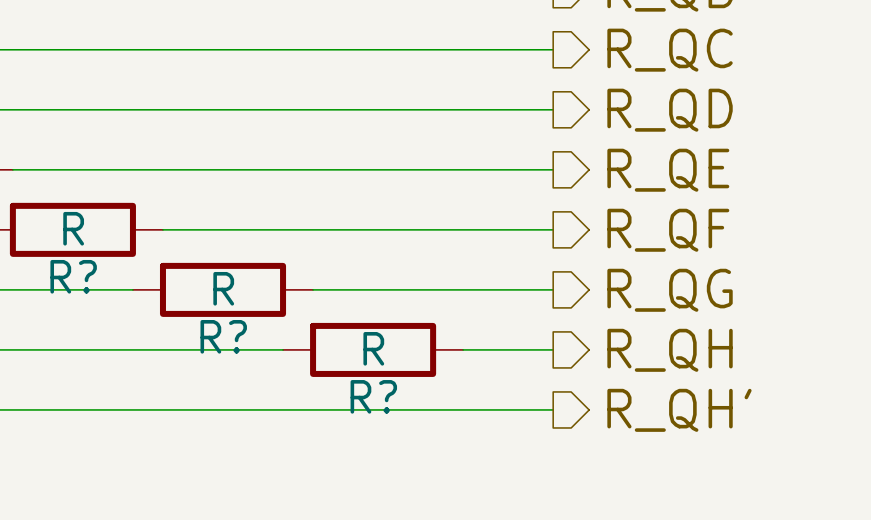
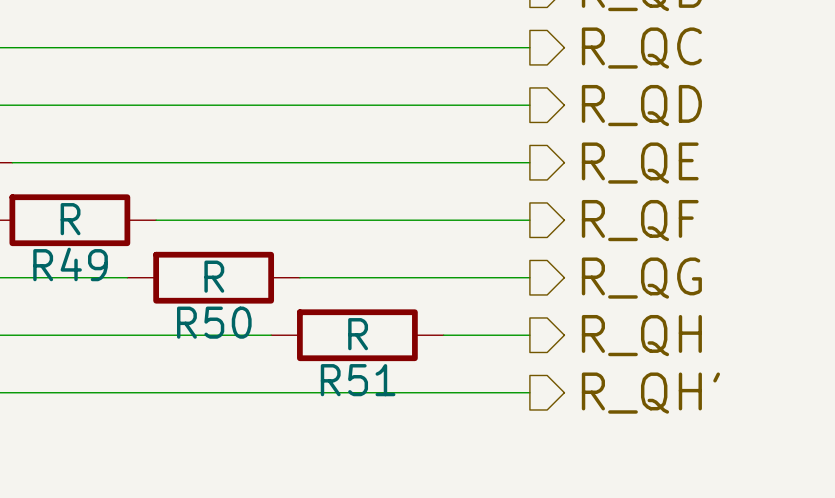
R? name: R? (73, 276) -> R49 (70, 264)
R? name: R? (223, 336) -> R50 (214, 322)
R? name: R? (373, 396) -> R51 (358, 380)

